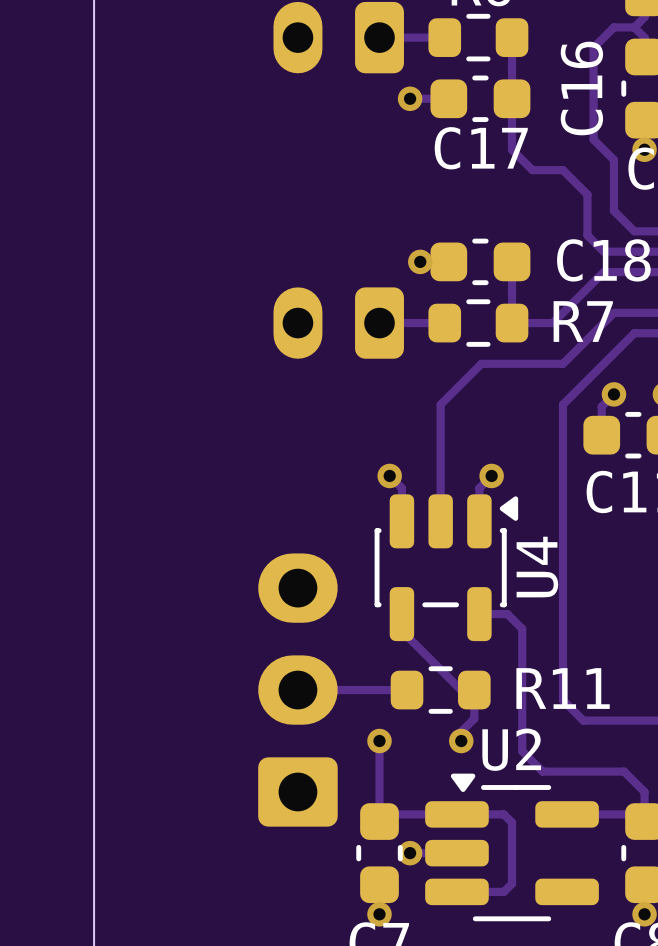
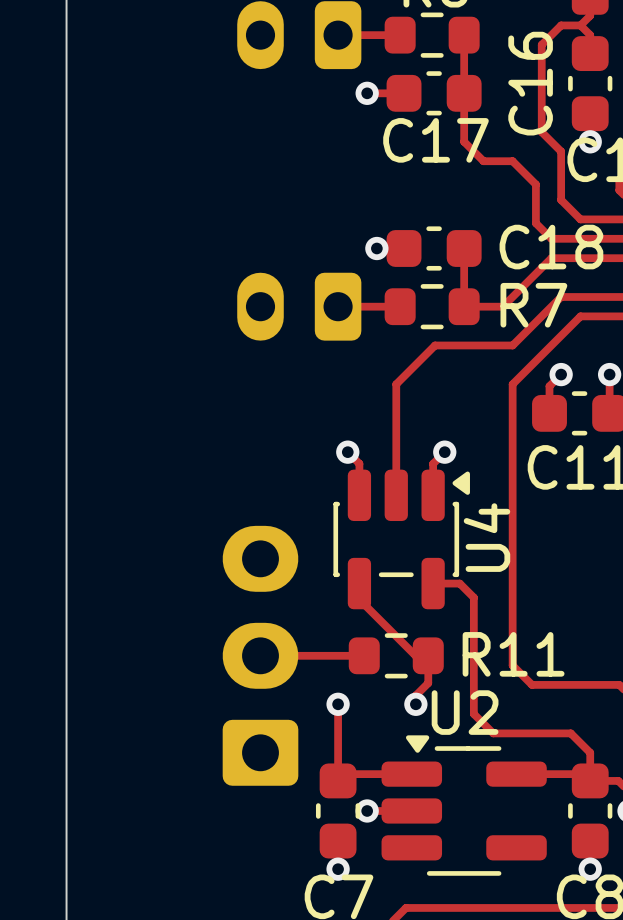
track: (456, 814) (503, 814) (512, 822) (512, 883) (503, 891) (456, 891) -> none

